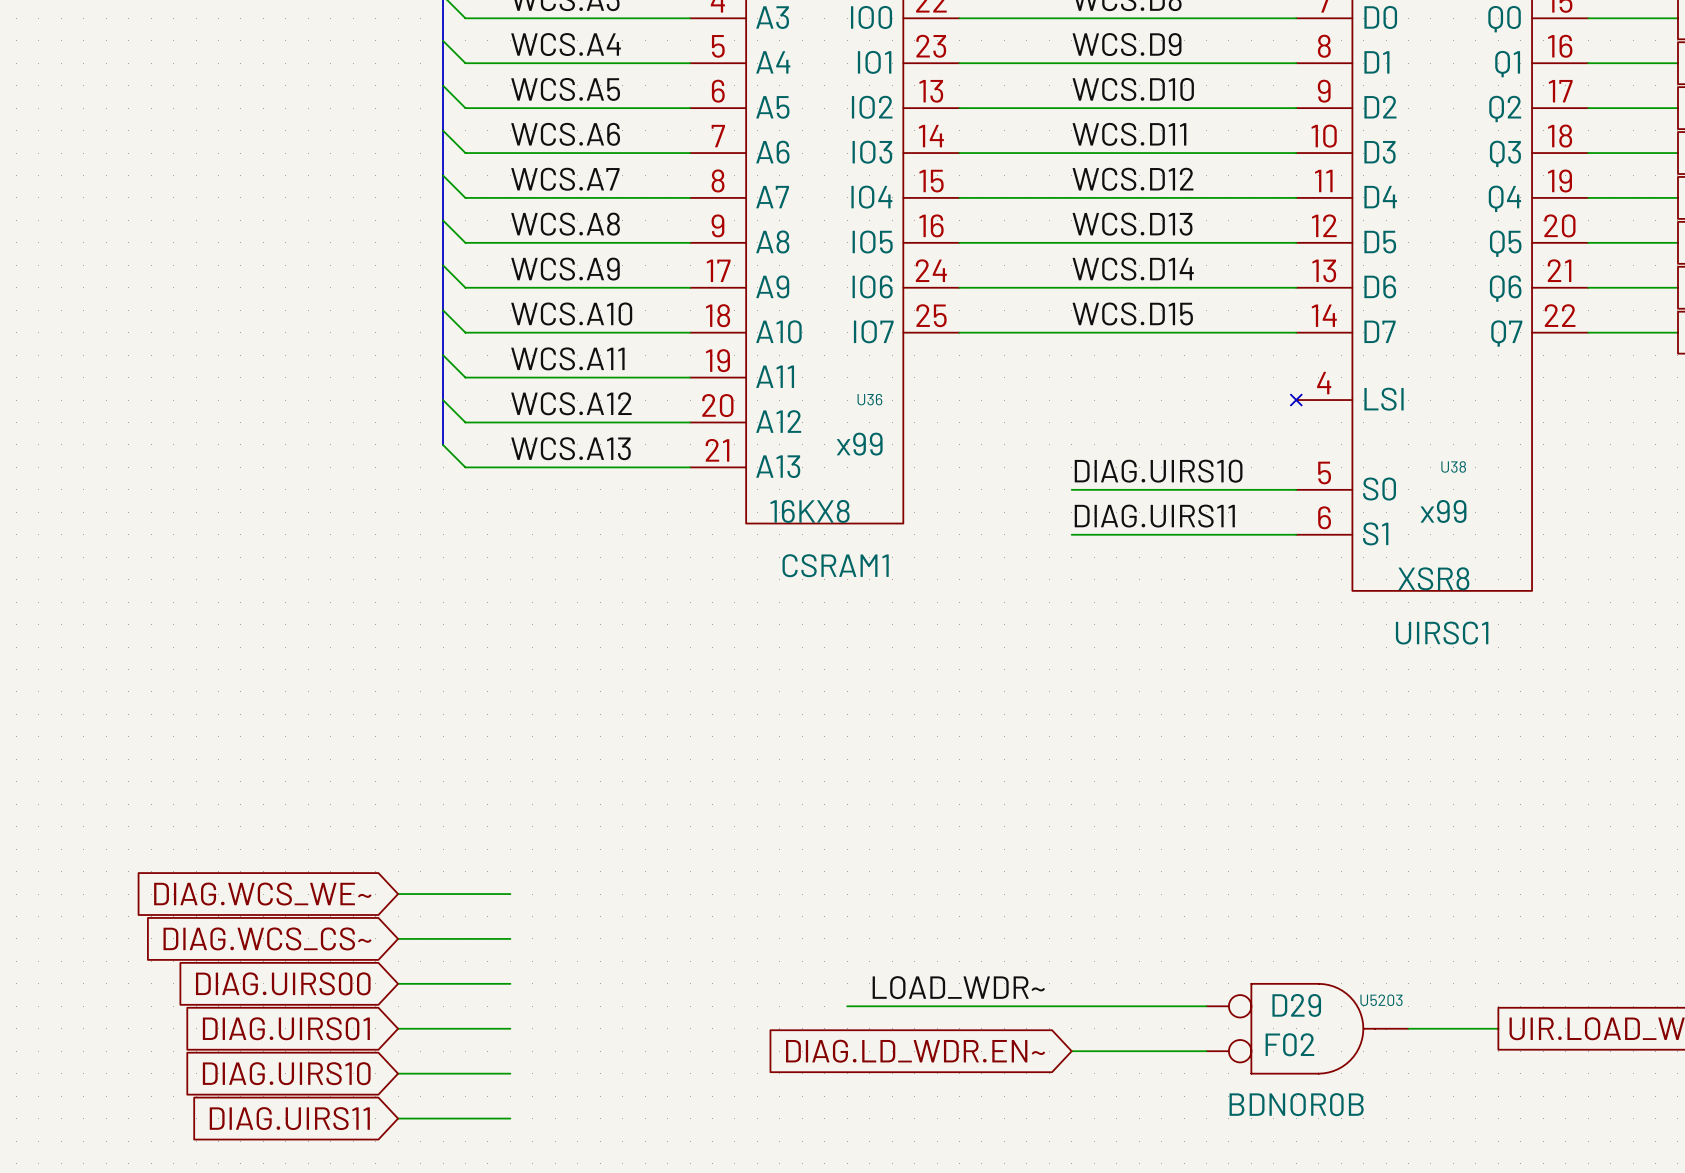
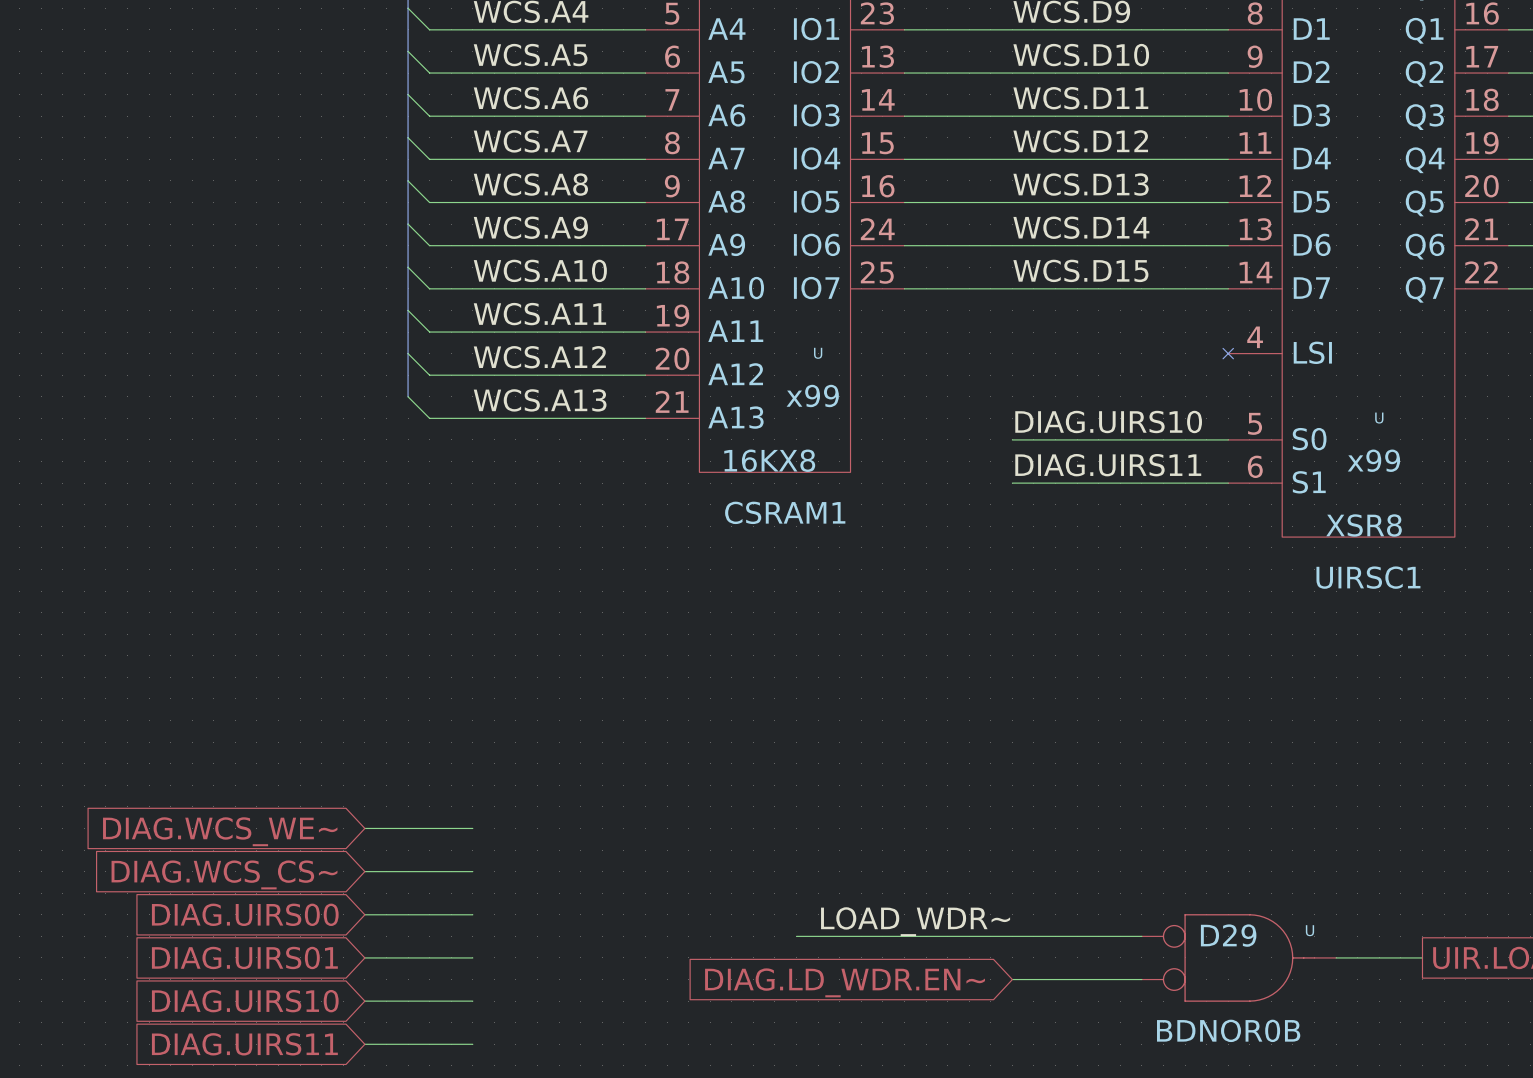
U36 name: U36 (869, 399) -> U (818, 353)
U38 name: U38 (1453, 466) -> U (1379, 418)
U5203 name: U5203 (1381, 1000) -> U (1309, 930)
U5203 value: F02 (1289, 1044) -> none

